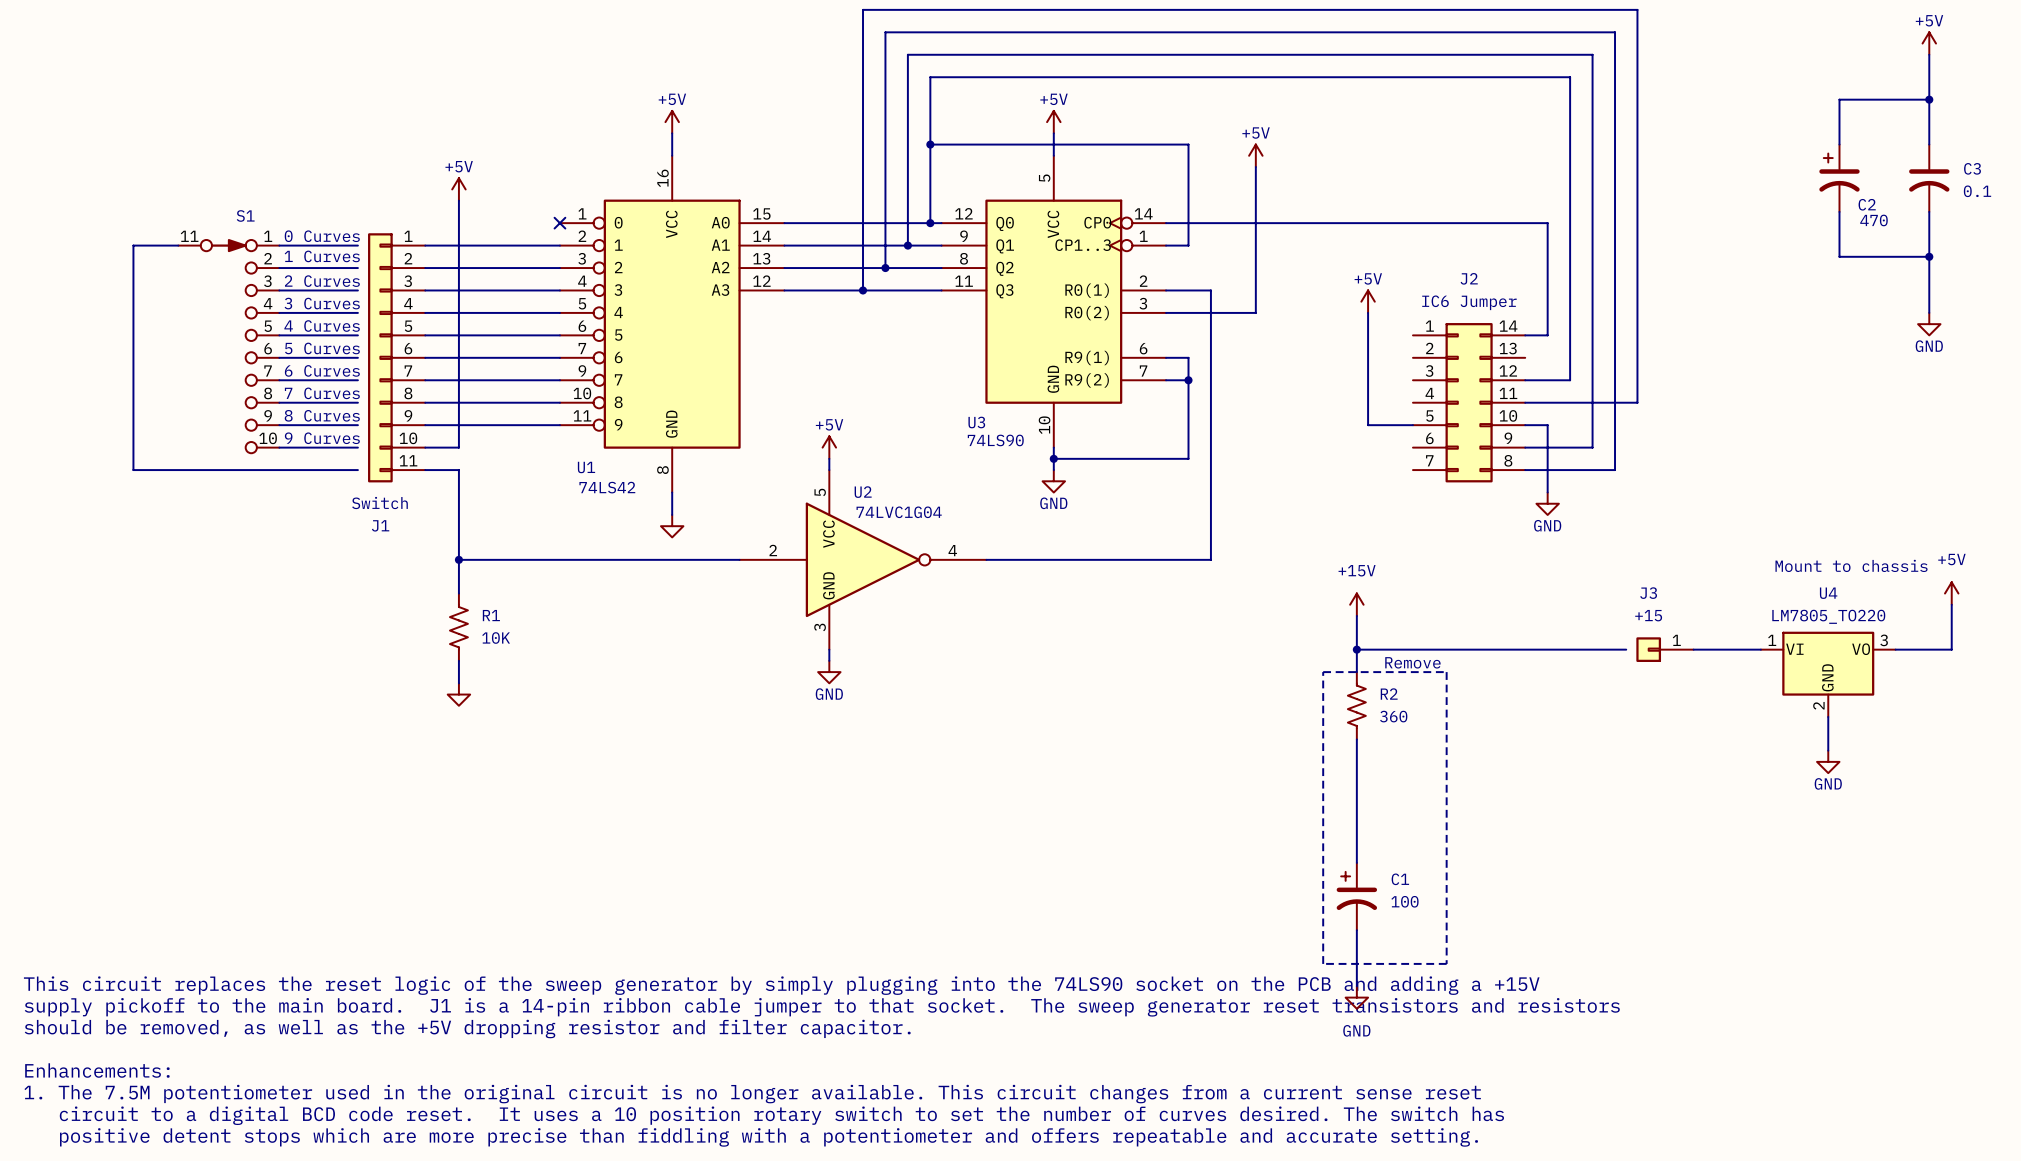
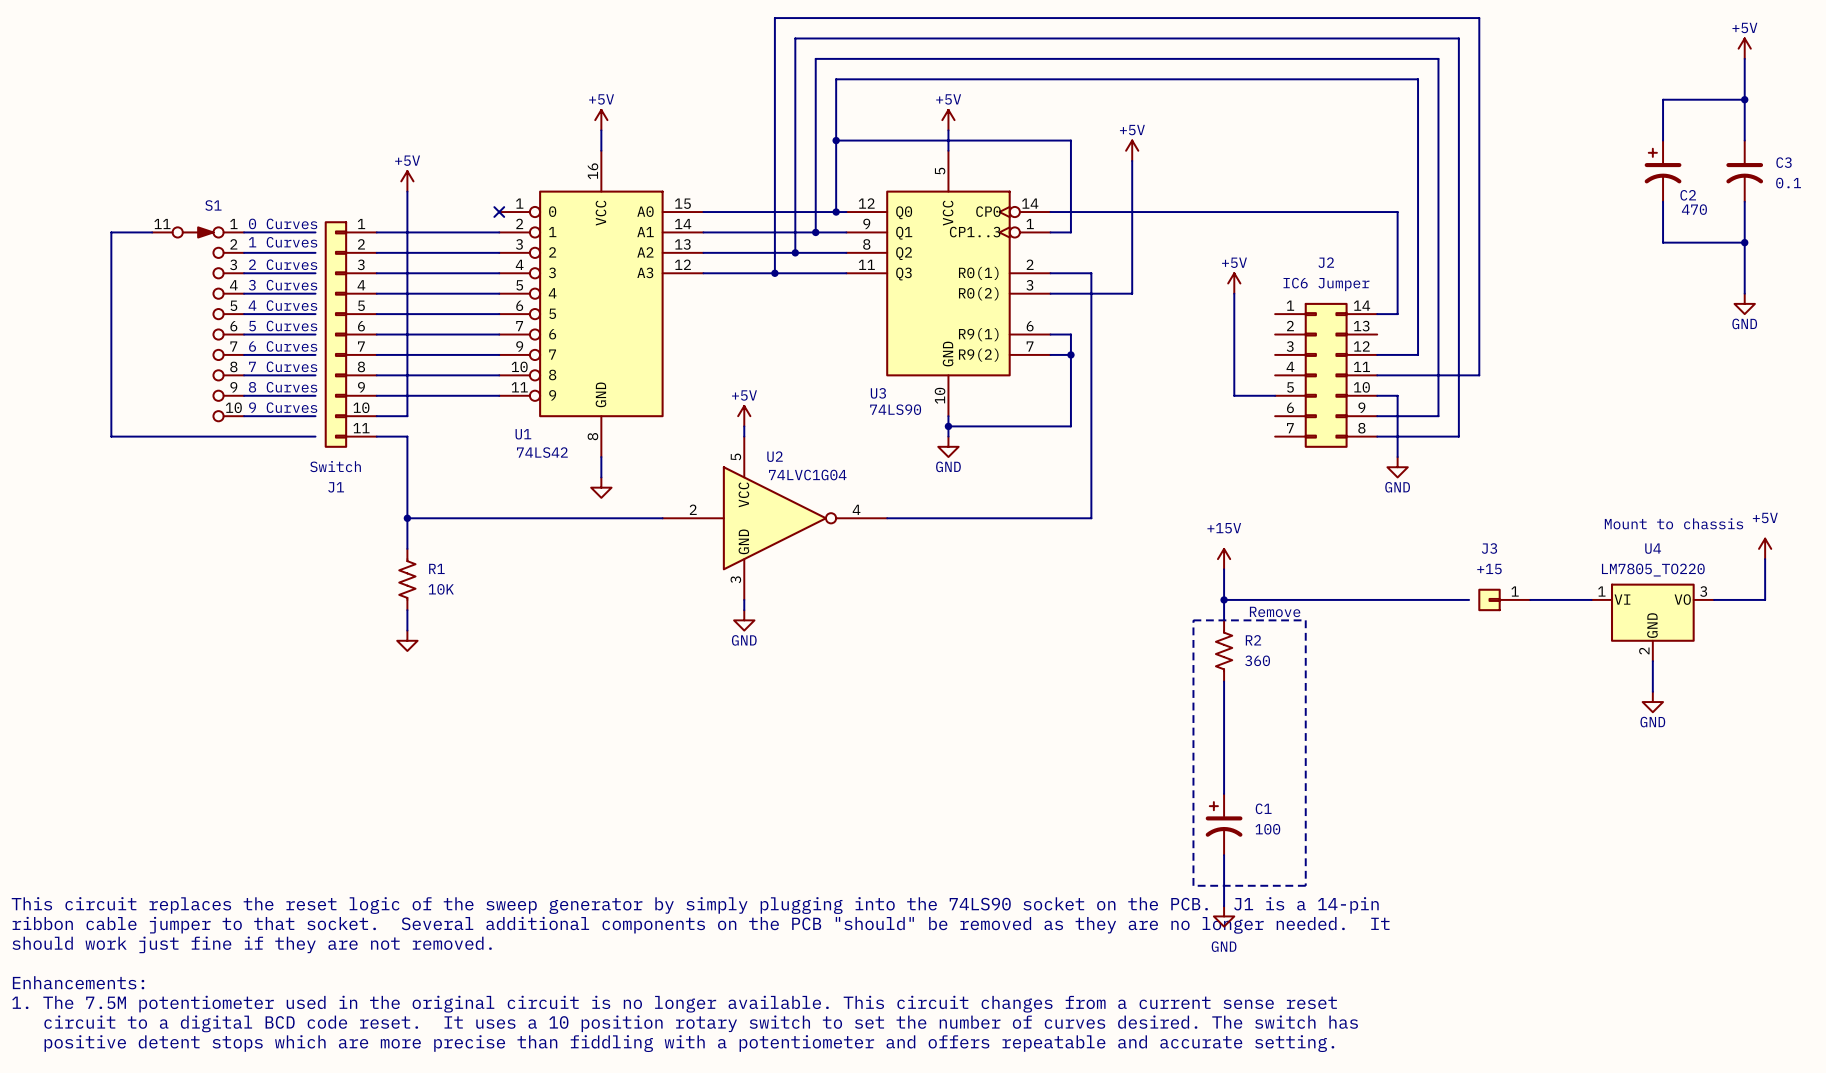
text: This circuit replaces the reset logic of the sweep generator by simply plugging into the 74LS90 socket on the PCB and adding a +15V (781, 985) -> This circuit replaces the reset logic of the sweep generator by simply plugging into the 74LS90 socket on the PCB. J1 is a 14-pin (695, 905)
text: supply pickoff to the main board. J1 is a 14-pin ribbon cable jumper to that socket. The sweep generator reset transistors and resistors (822, 1007) -> ribbon cable jumper to that socket. Several additional components on the PCB "should" be removed as they are no longer needed. It (701, 925)
text: should be removed, as well as the +5V dropping resistor and filter capacitor. (467, 1029) -> should work just fine if they are not removed. (252, 944)

